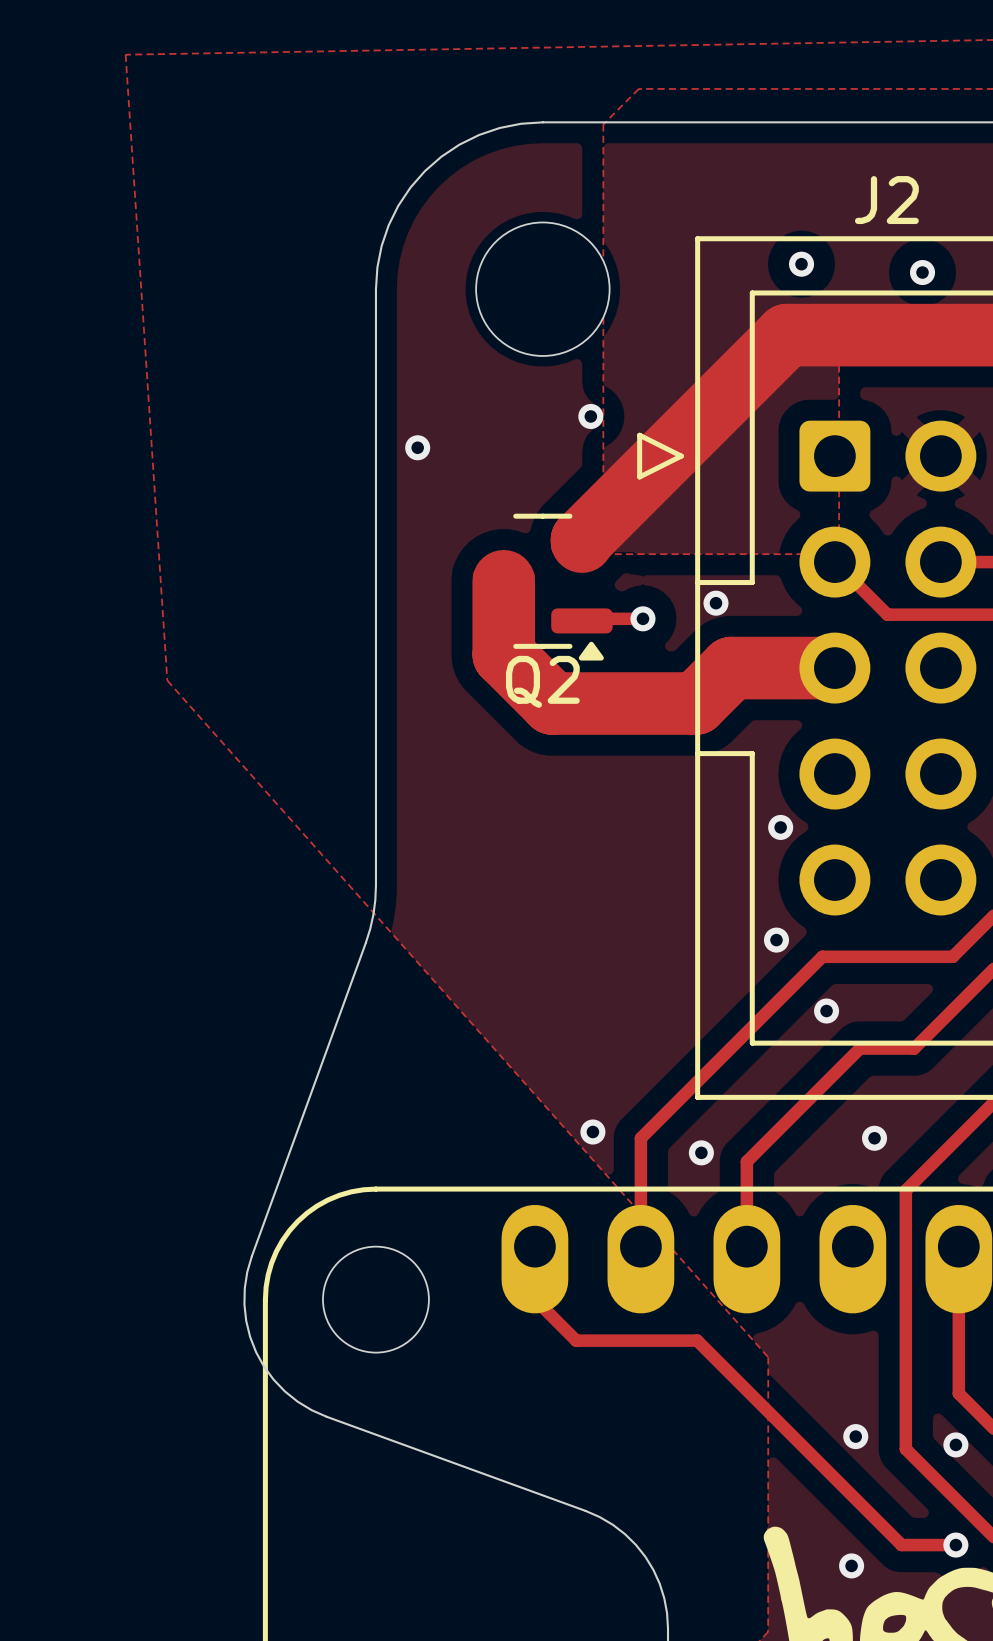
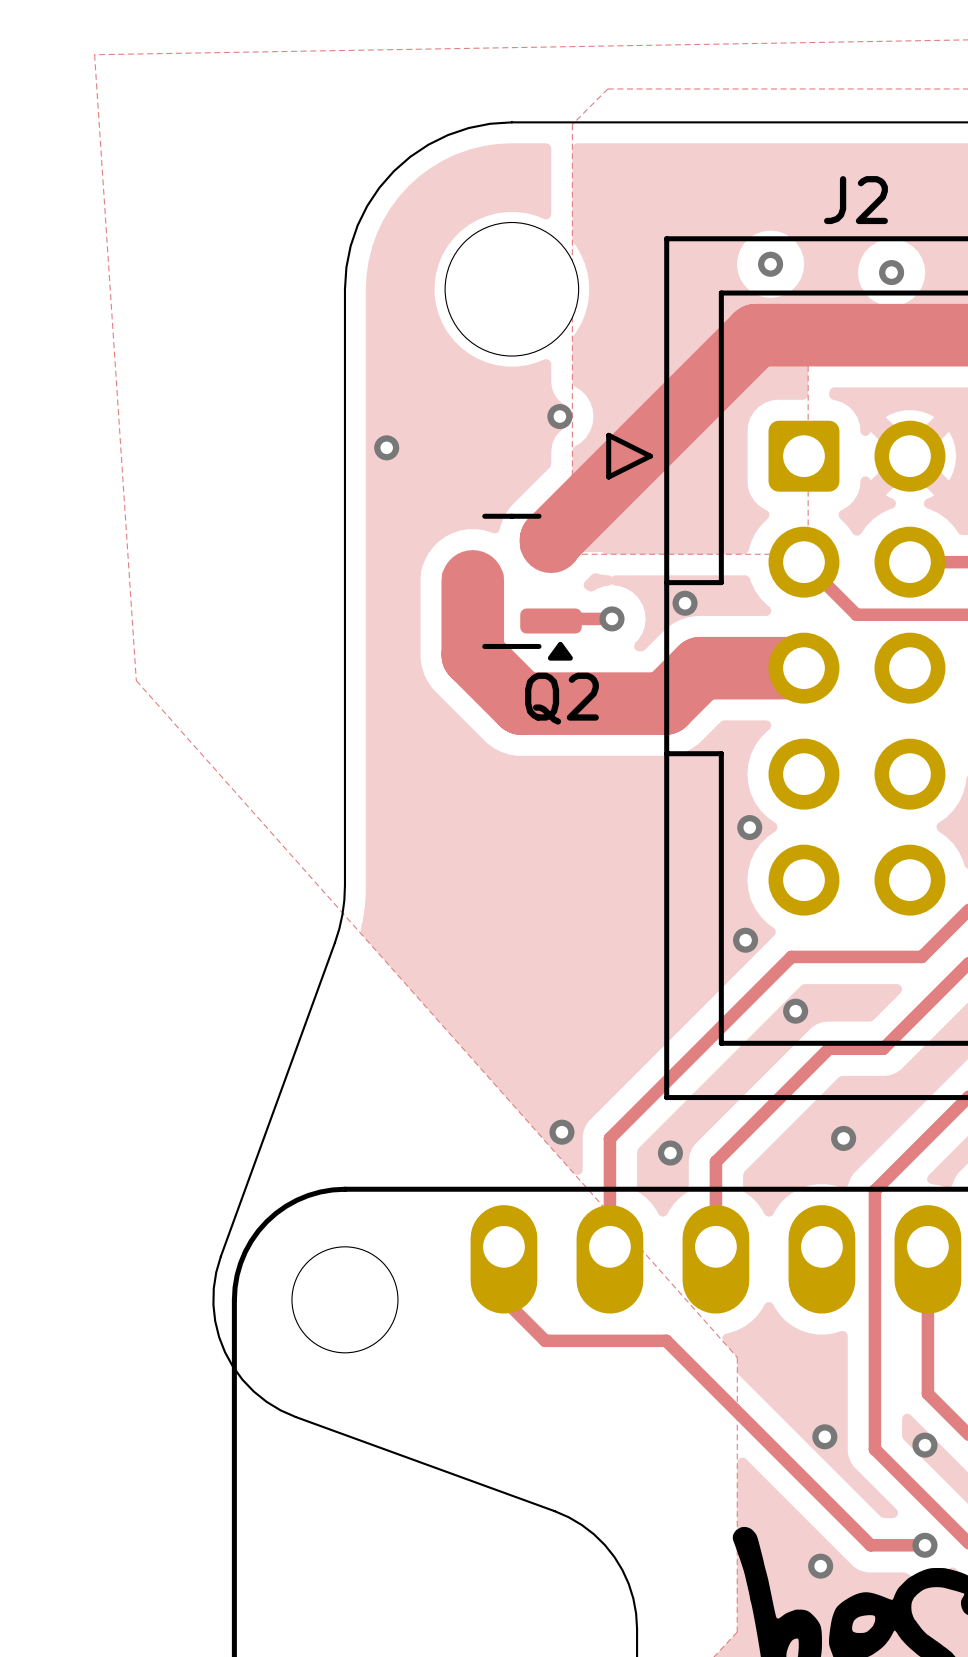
Q2 name position: Q2 (542, 681) -> Q2 (561, 698)

